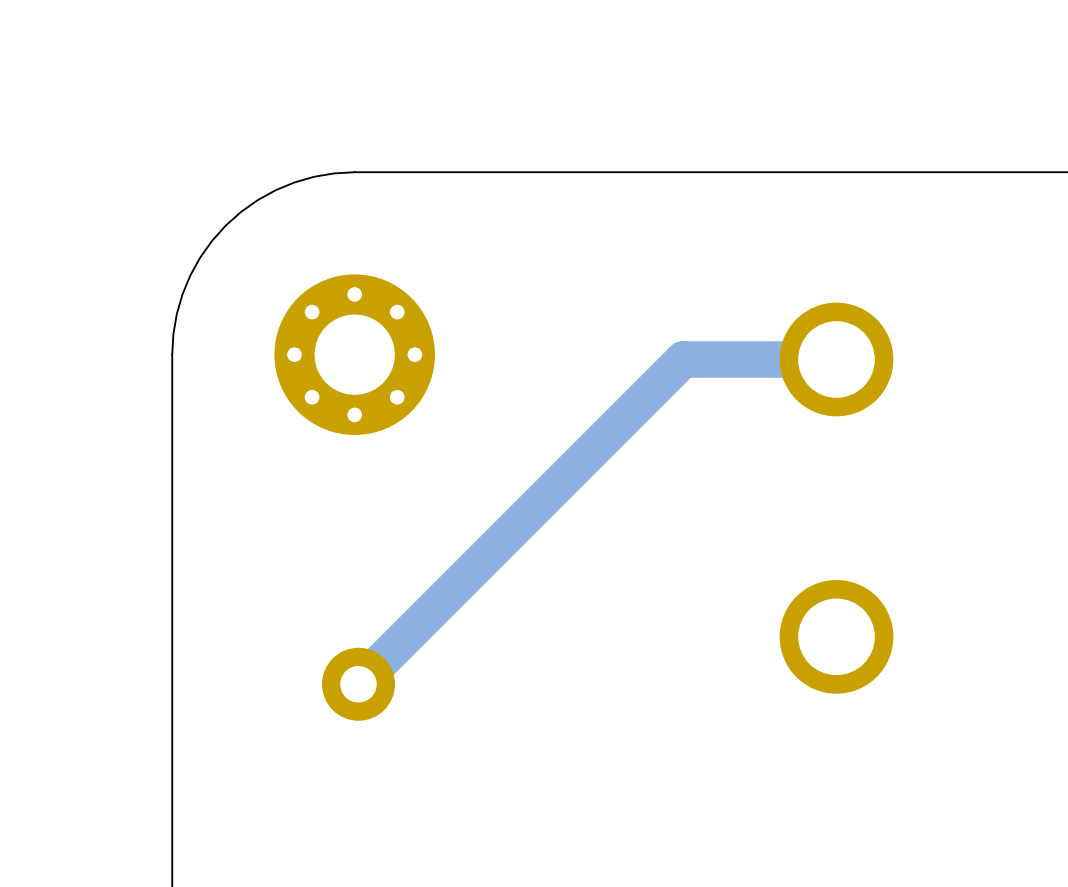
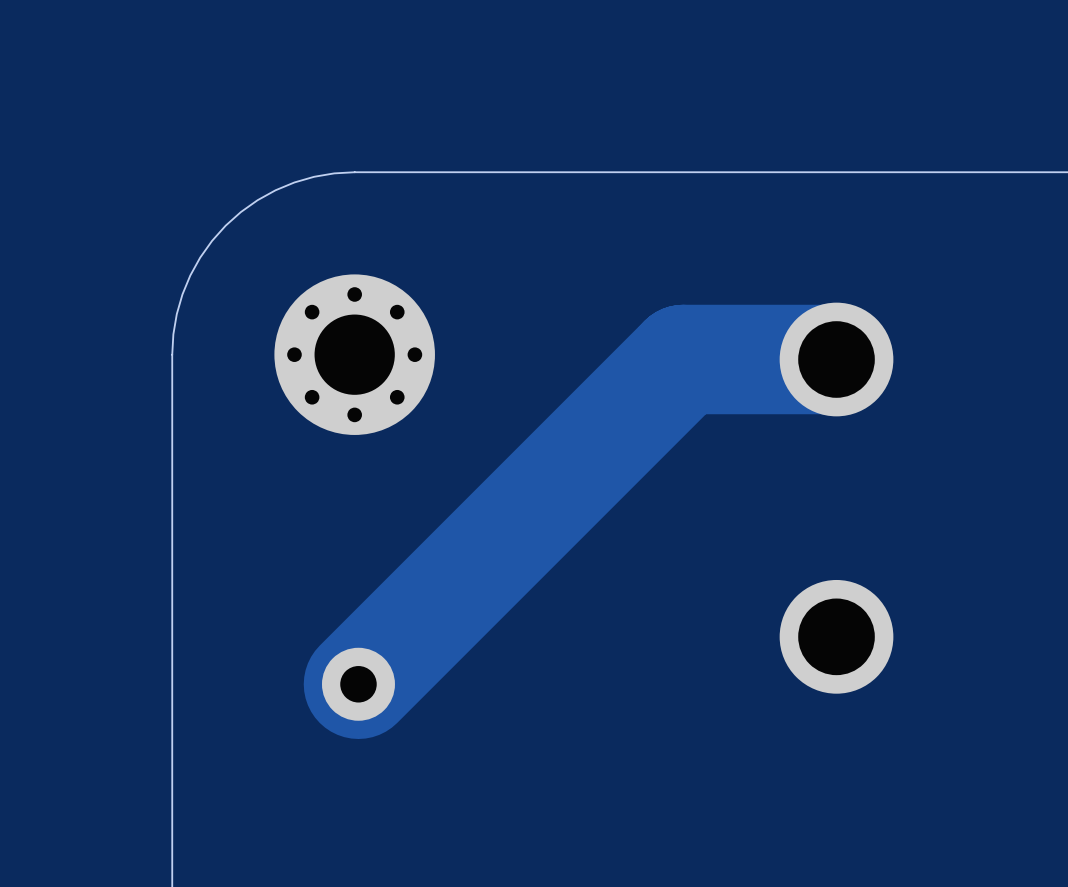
track width: thin (836, 359) (683, 359) (358, 684) -> thick (836, 359) (683, 359) (358, 684)

